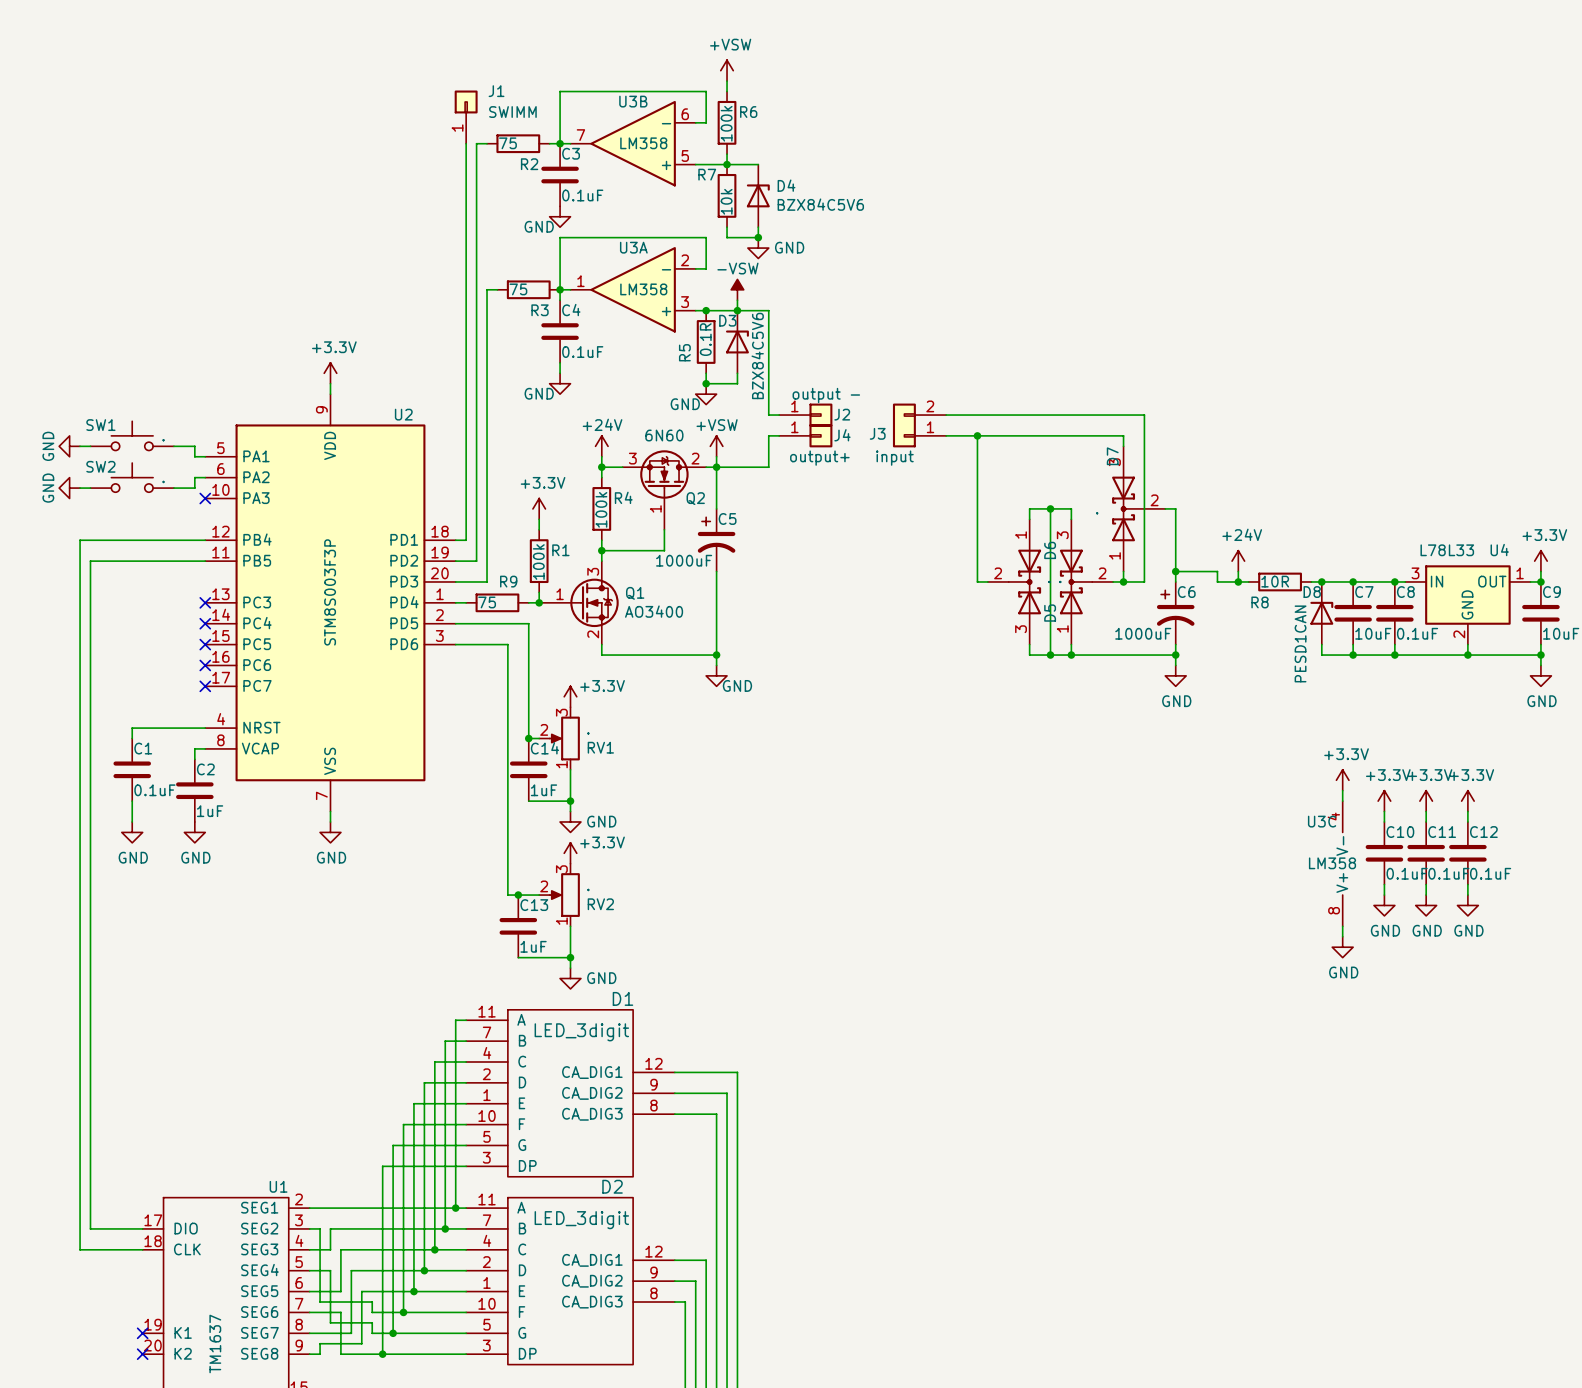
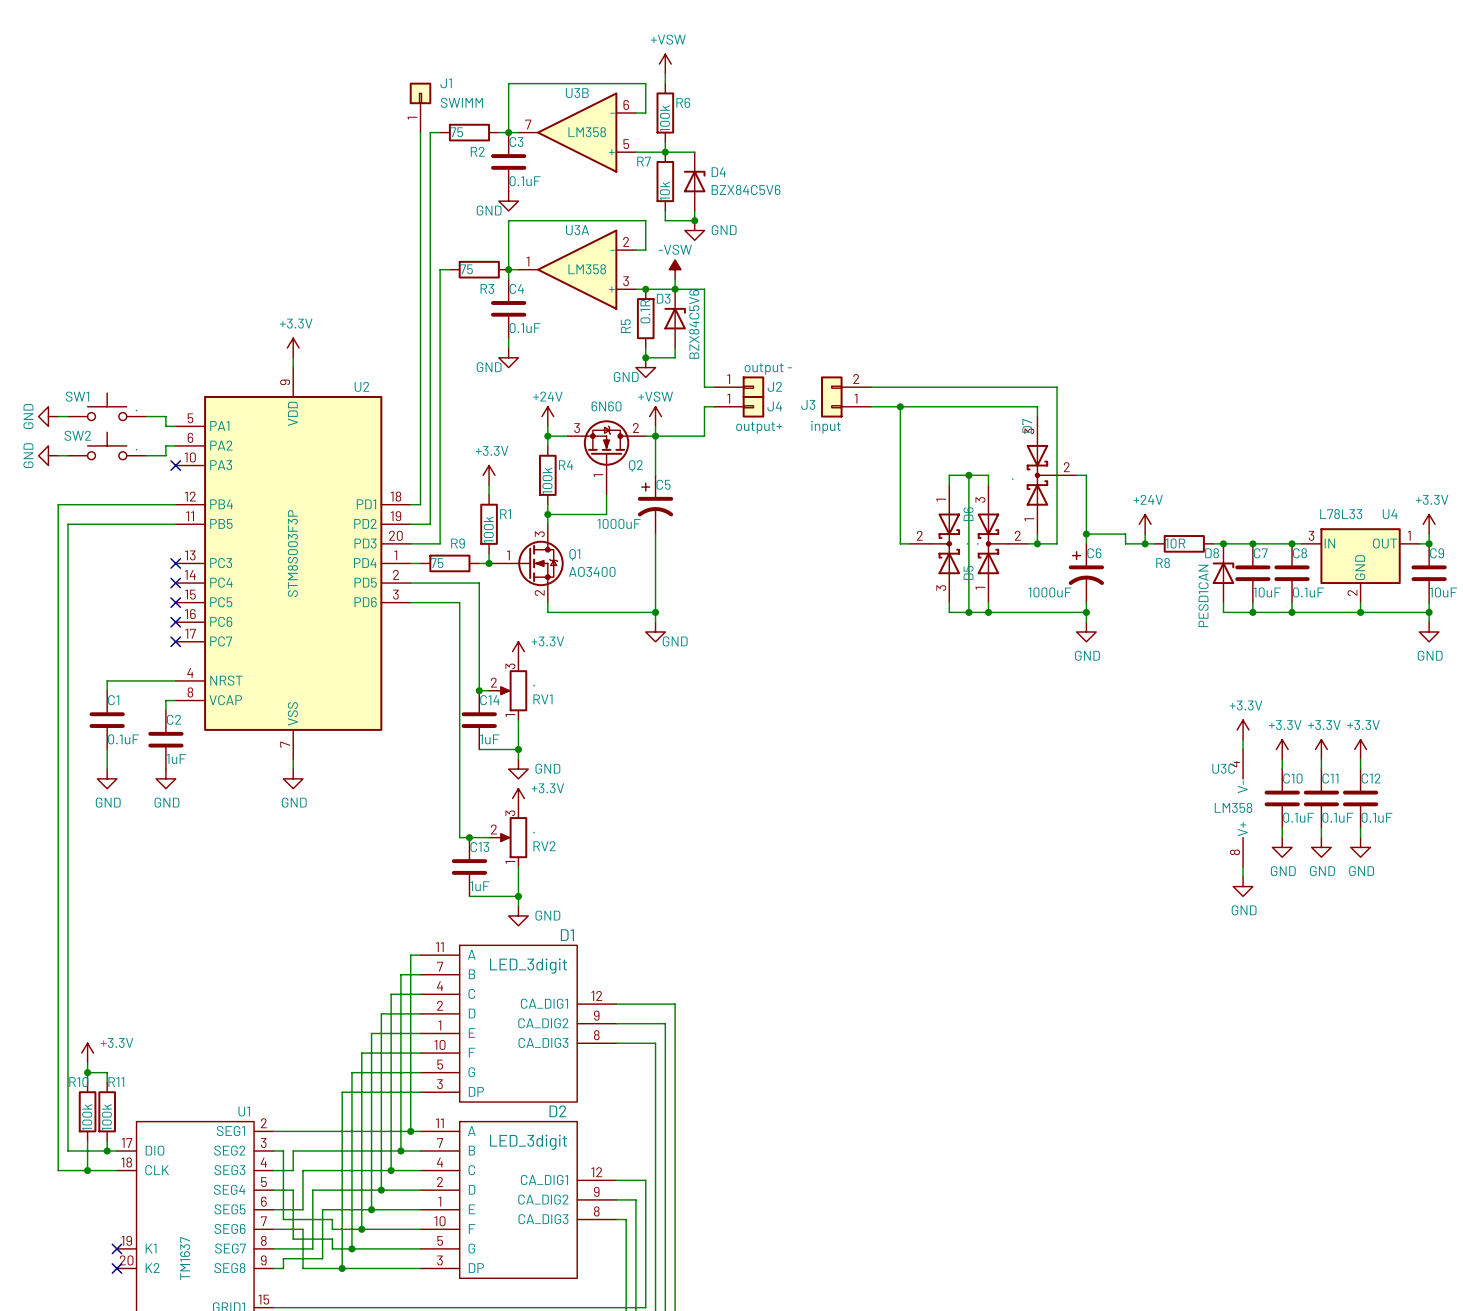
power symbol: none -> +3.3V (87, 1053)
wire: none -> (87, 1062) (87, 1082)
wire: none -> (87, 1072) (107, 1072) (107, 1082)
junction: none -> (87, 1072)
R10: none -> 100k (87, 1111)
R11: none -> 100k (107, 1111)
wire: none -> (87, 1141) (87, 1170)
wire: none -> (107, 1141) (107, 1150)
junction: none -> (107, 1150)
junction: none -> (87, 1170)

